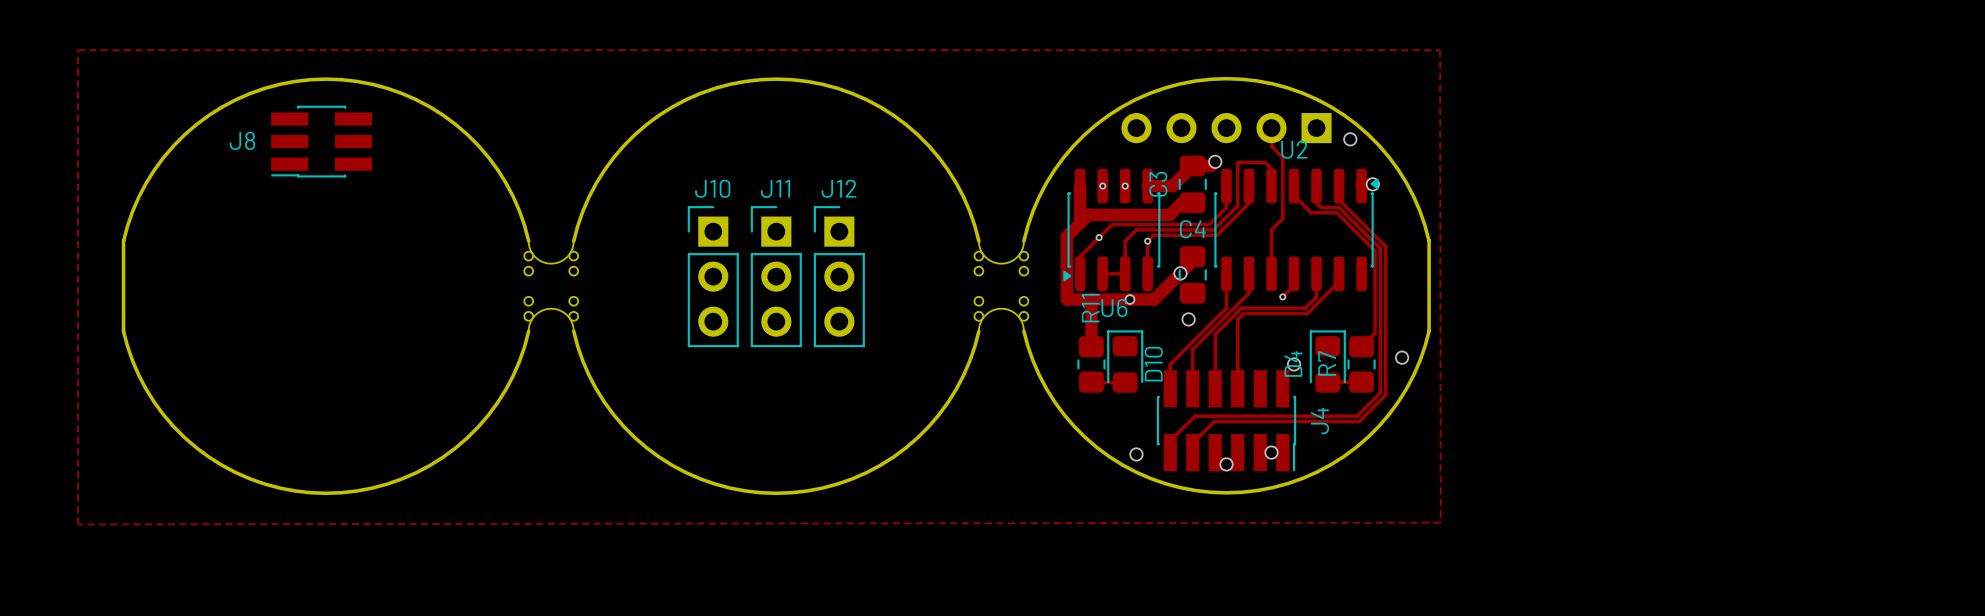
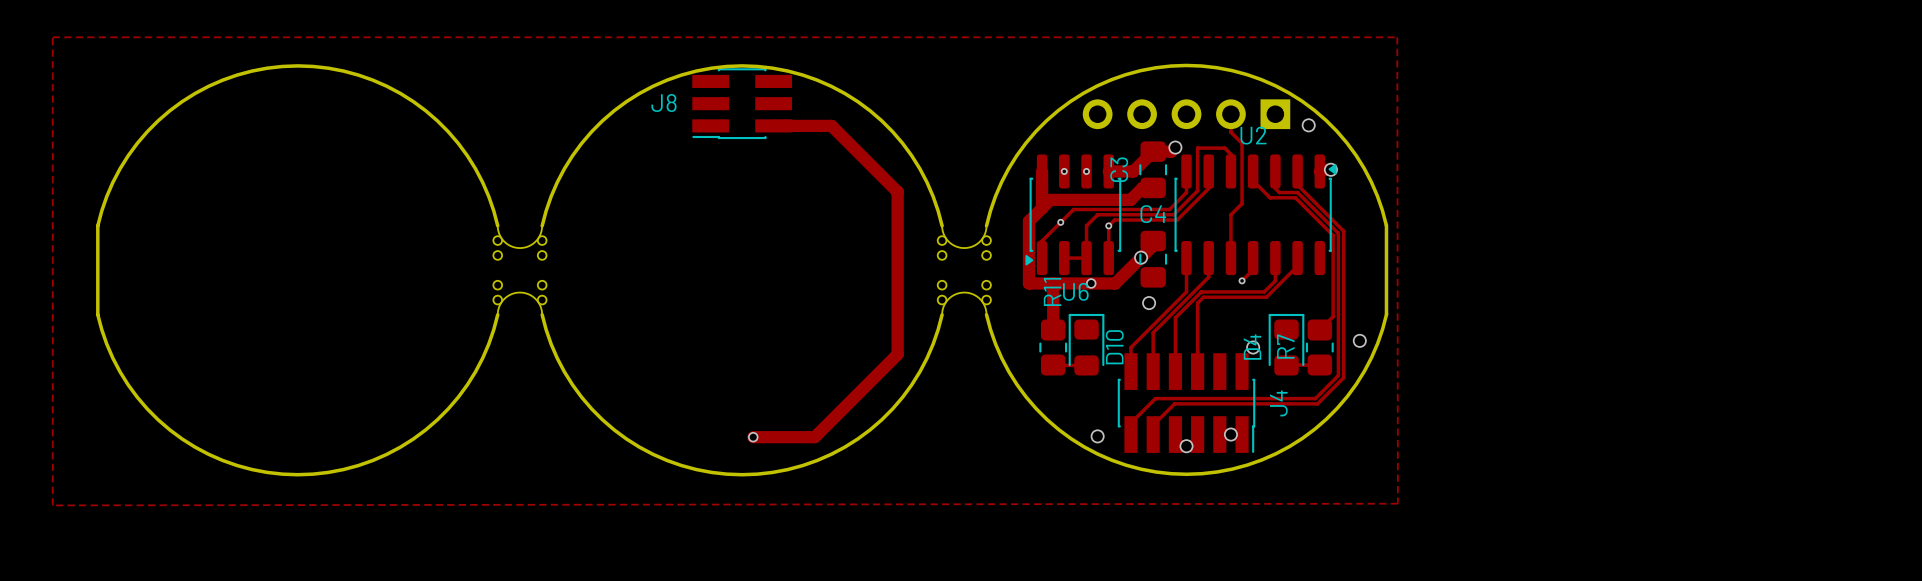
track: none -> (773, 125) (831, 125) (897, 191) (897, 354) (814, 437) (753, 437)
J8 position: (321, 141) -> (742, 103)
J10: (713, 276) -> none
J11: (776, 276) -> none
J12: (839, 276) -> none
via: none -> (753, 437)

